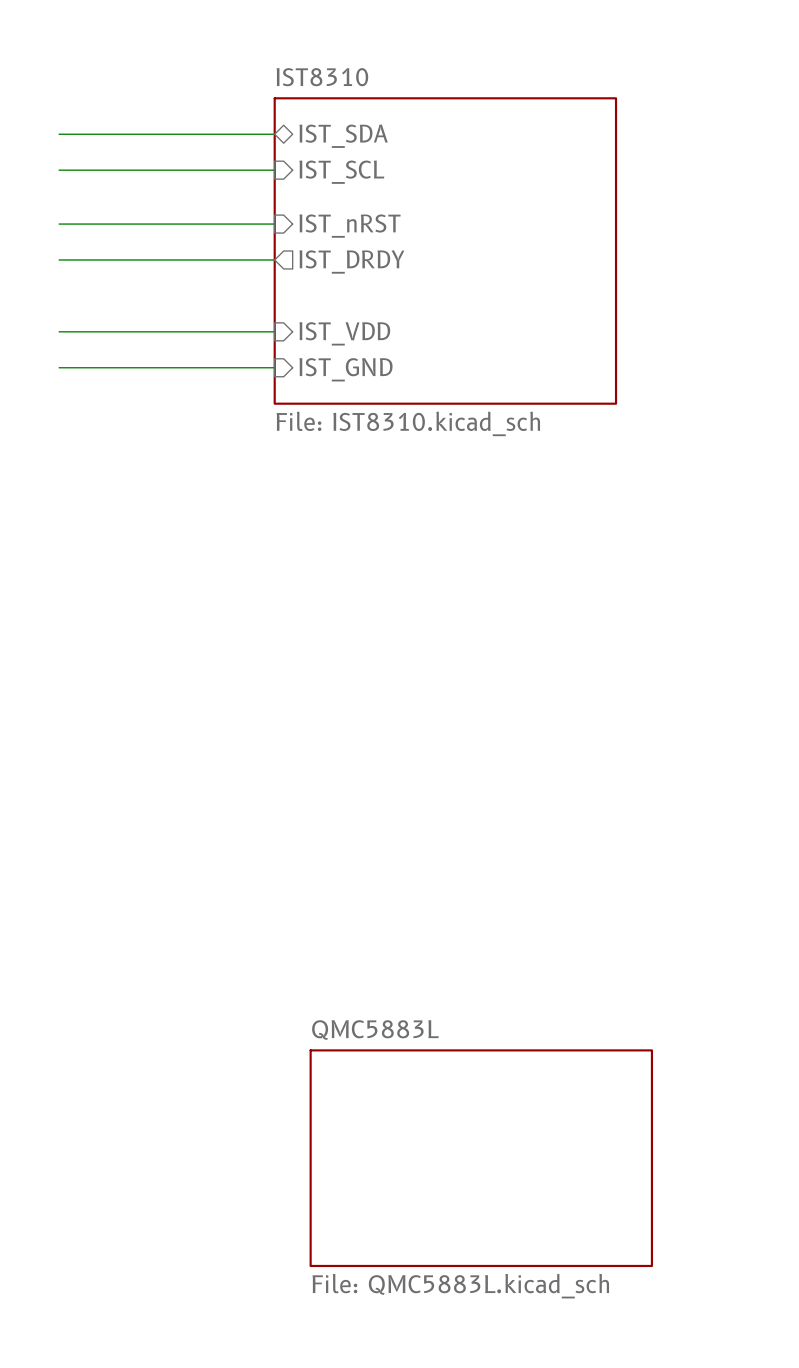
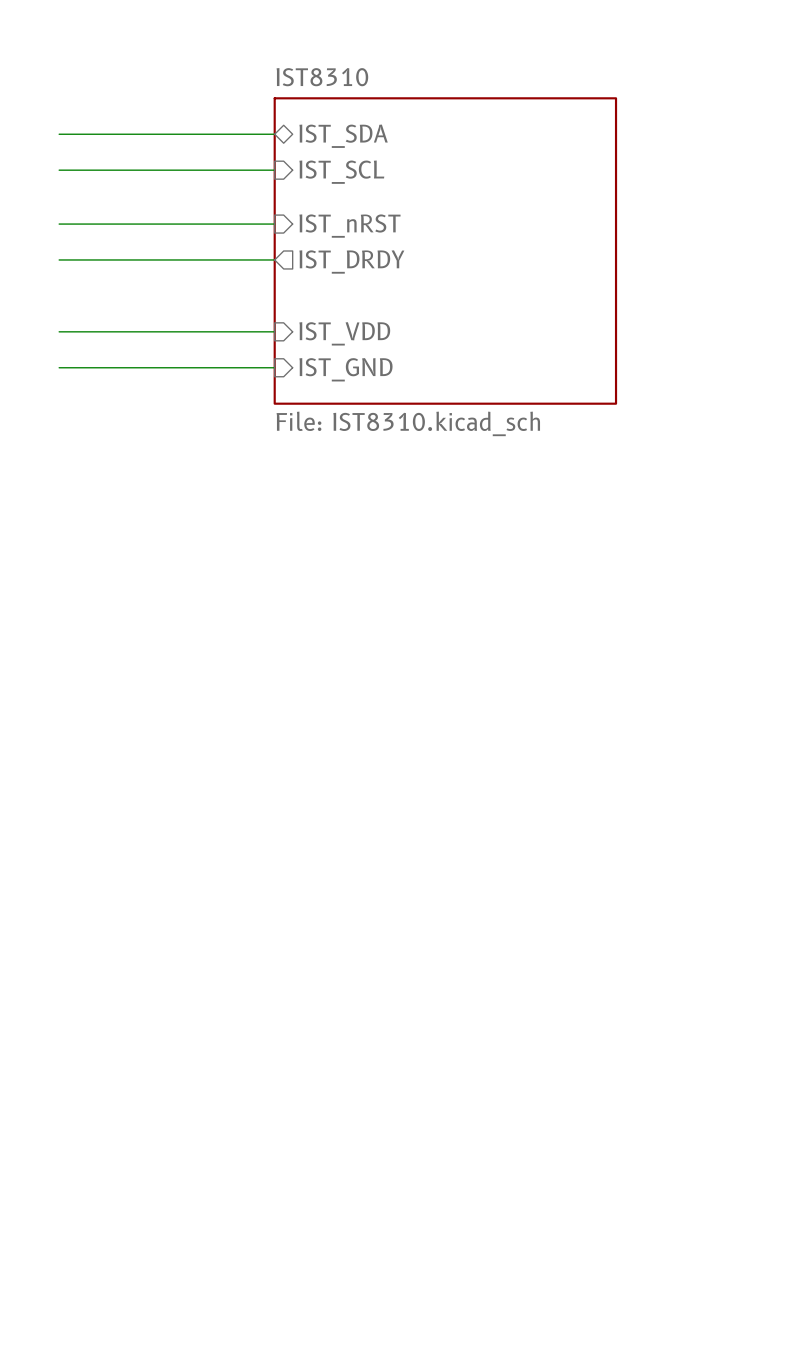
sheet QMC5883L: File: QMC5883L.kicad_sch (481, 1158) -> none

